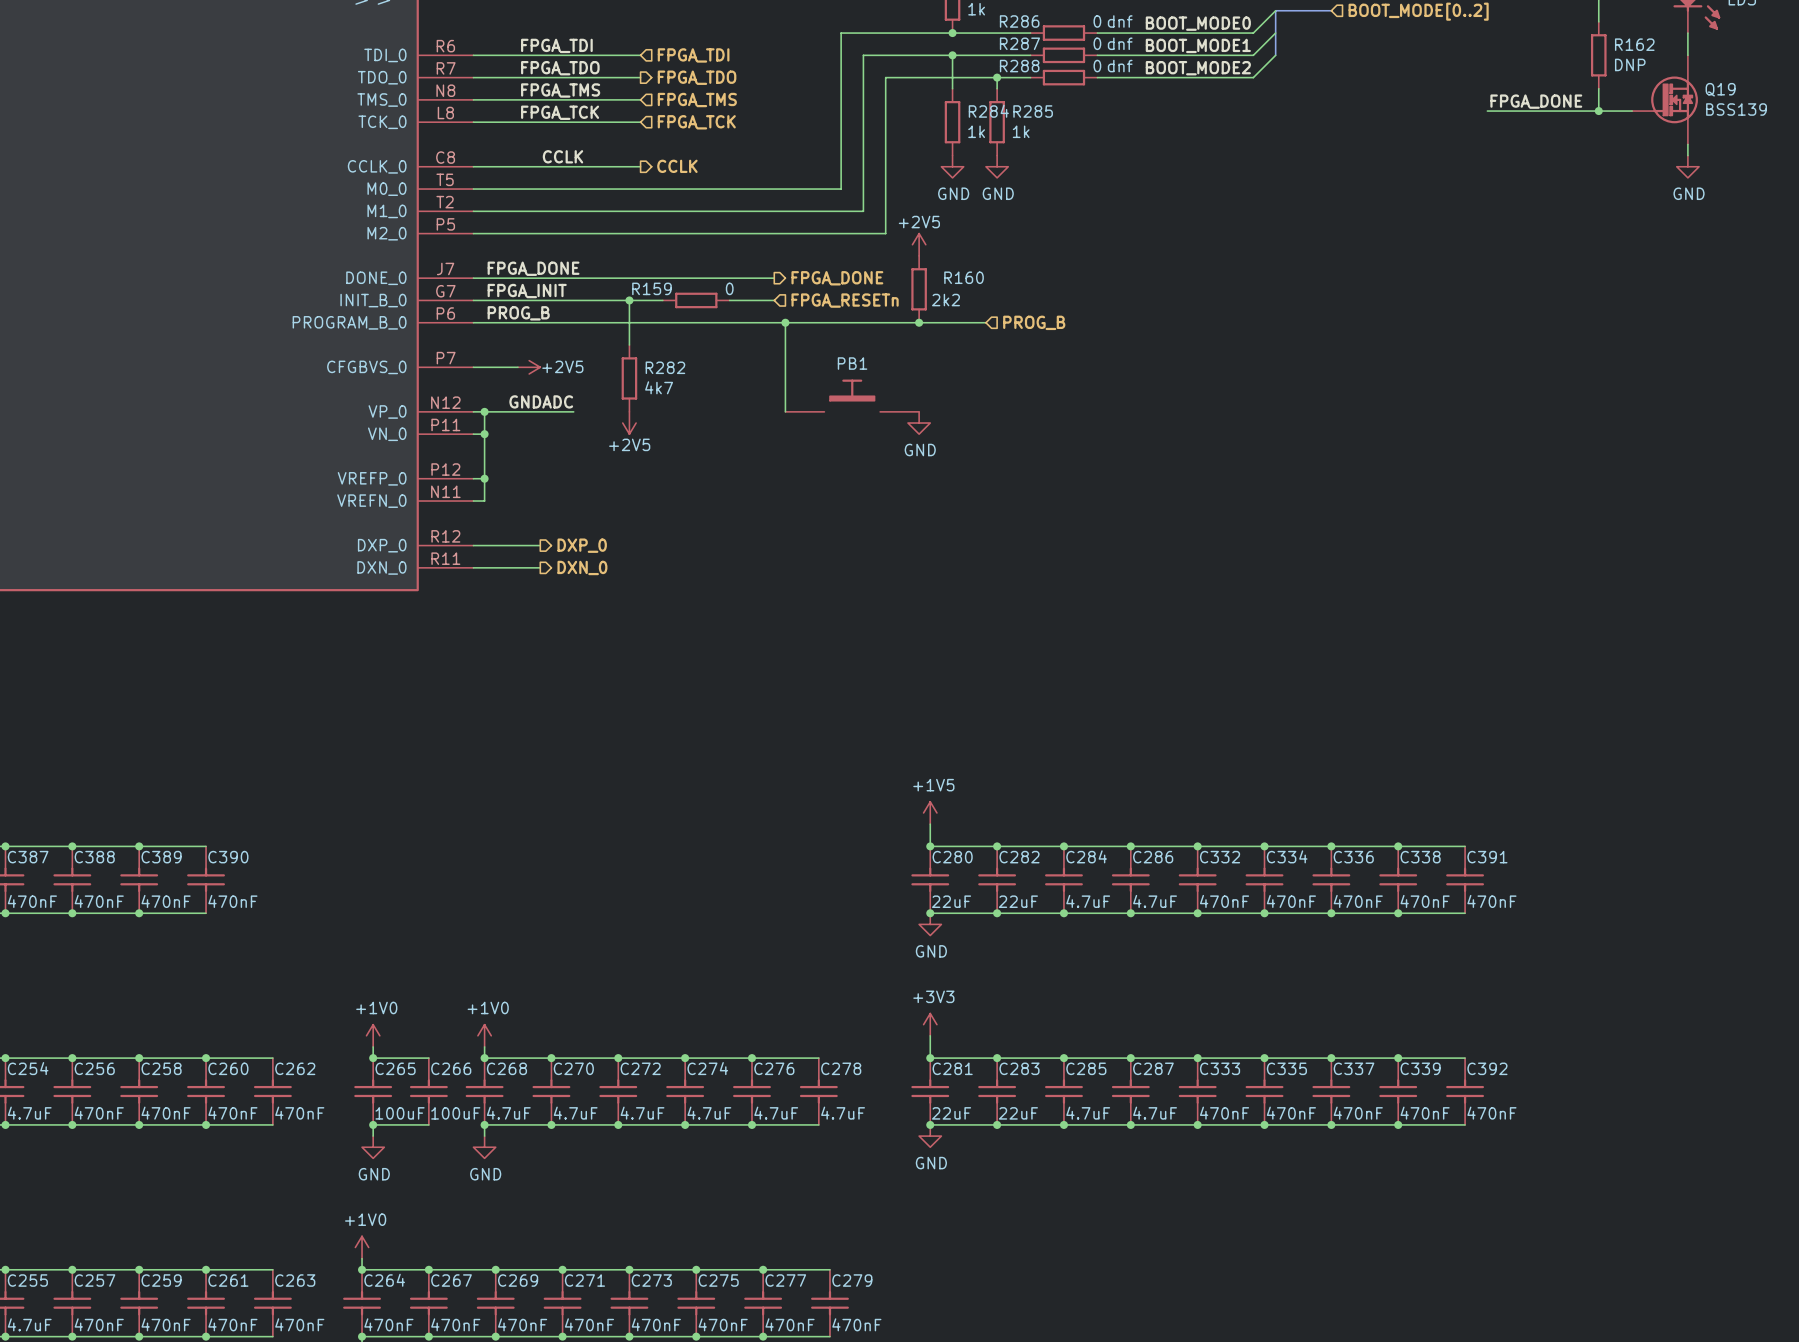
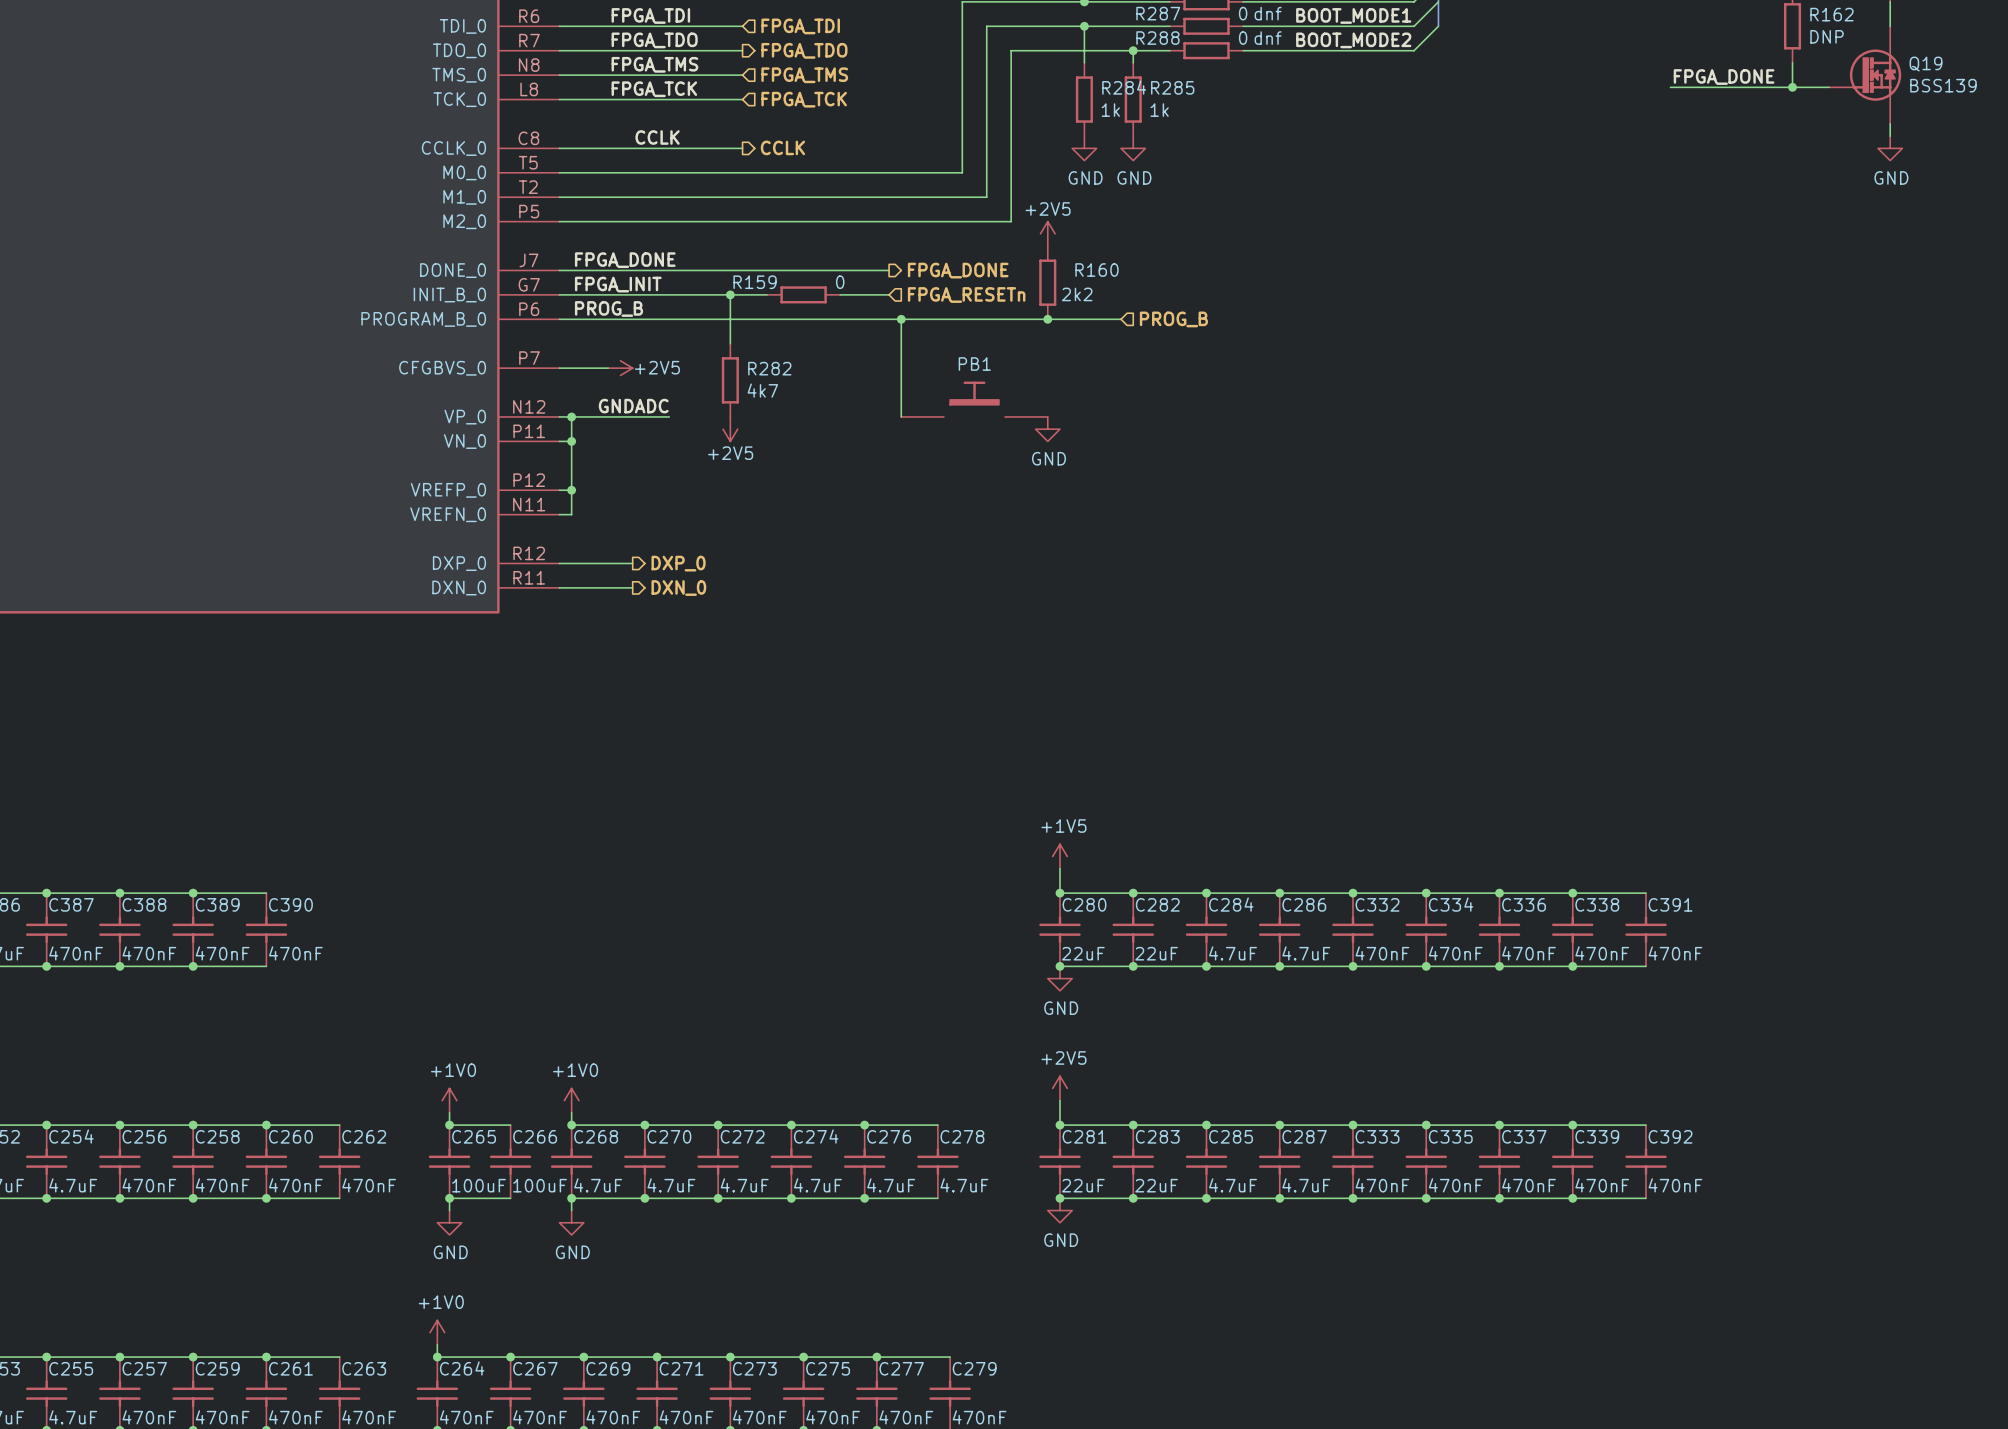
power symbol: +3V3 (930, 1024) -> +2V5 (1059, 1088)

